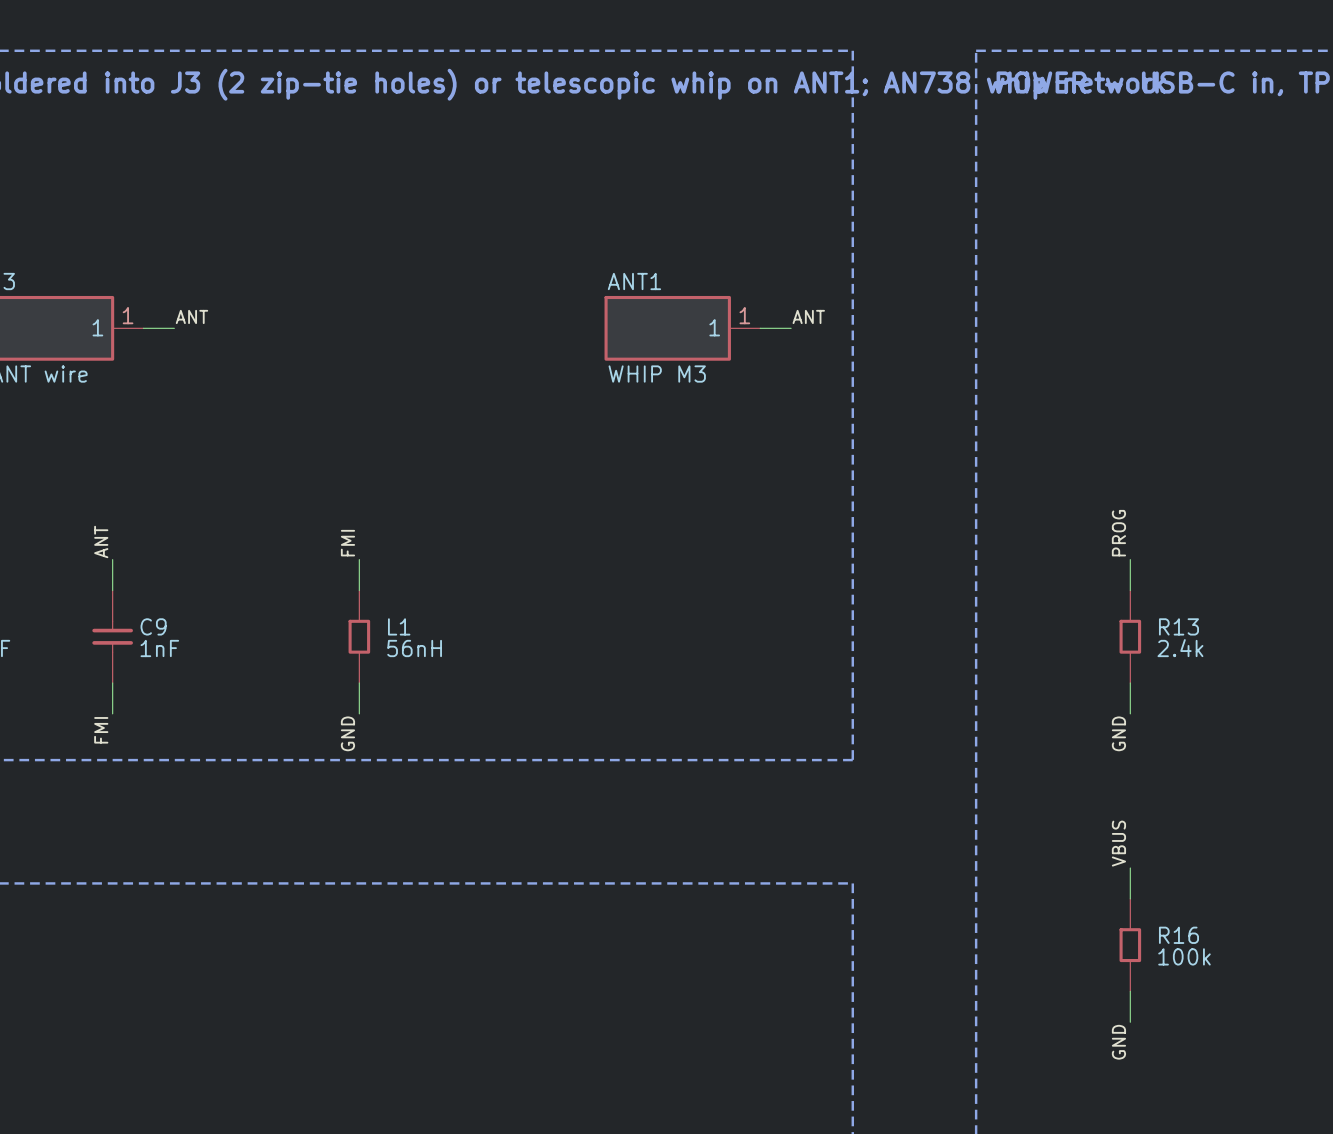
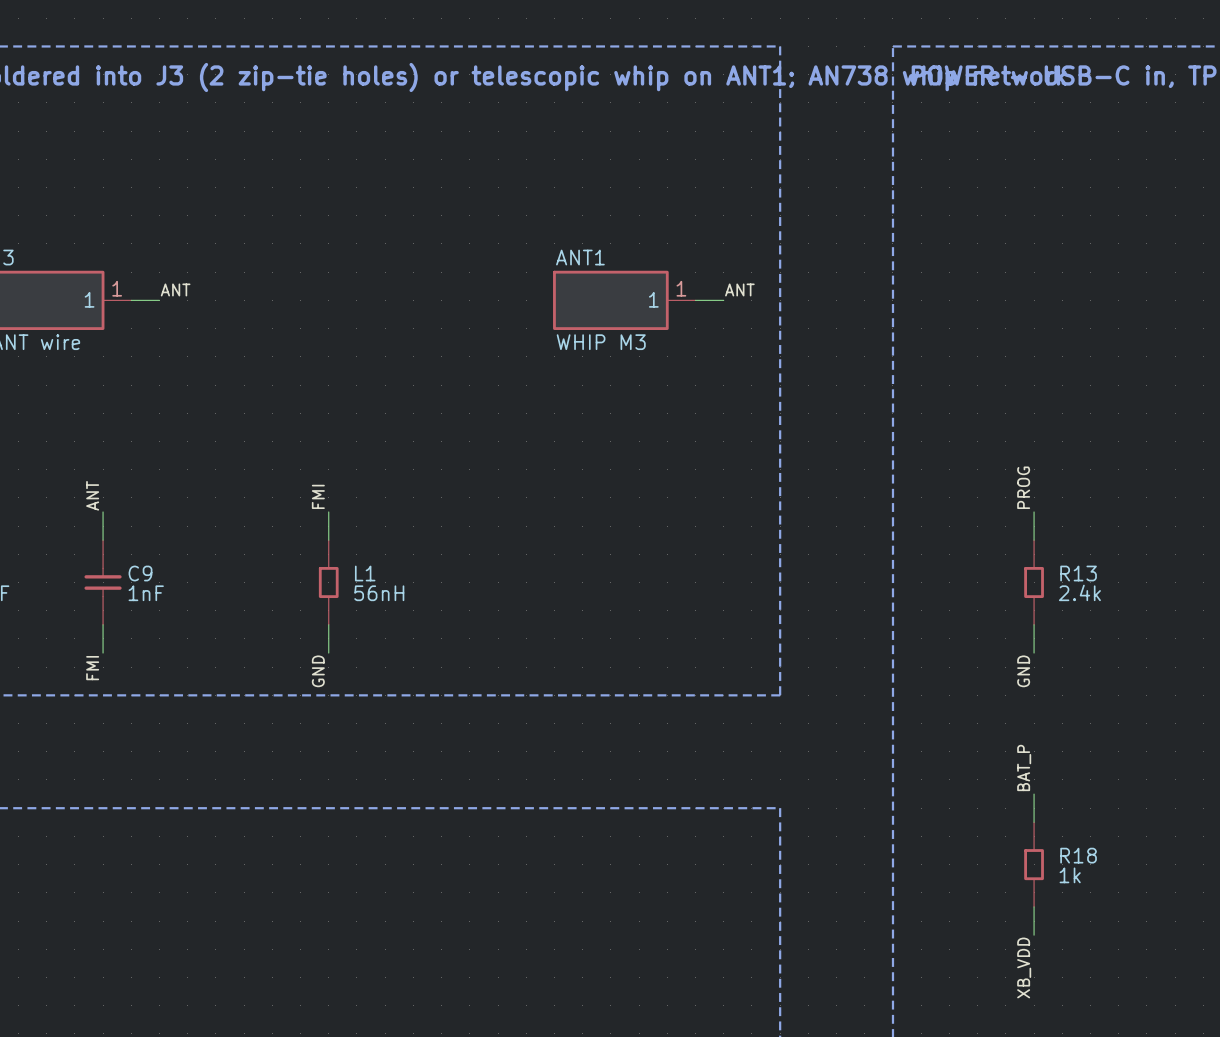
label: VBUS (1118, 843) -> BAT_P (1024, 767)
R16 name: R16 (1178, 935) -> R18 (1078, 855)
R16 value: 100k (1184, 956) -> 1k (1070, 875)
label: GND (1118, 1042) -> XB_VDD (1024, 967)

